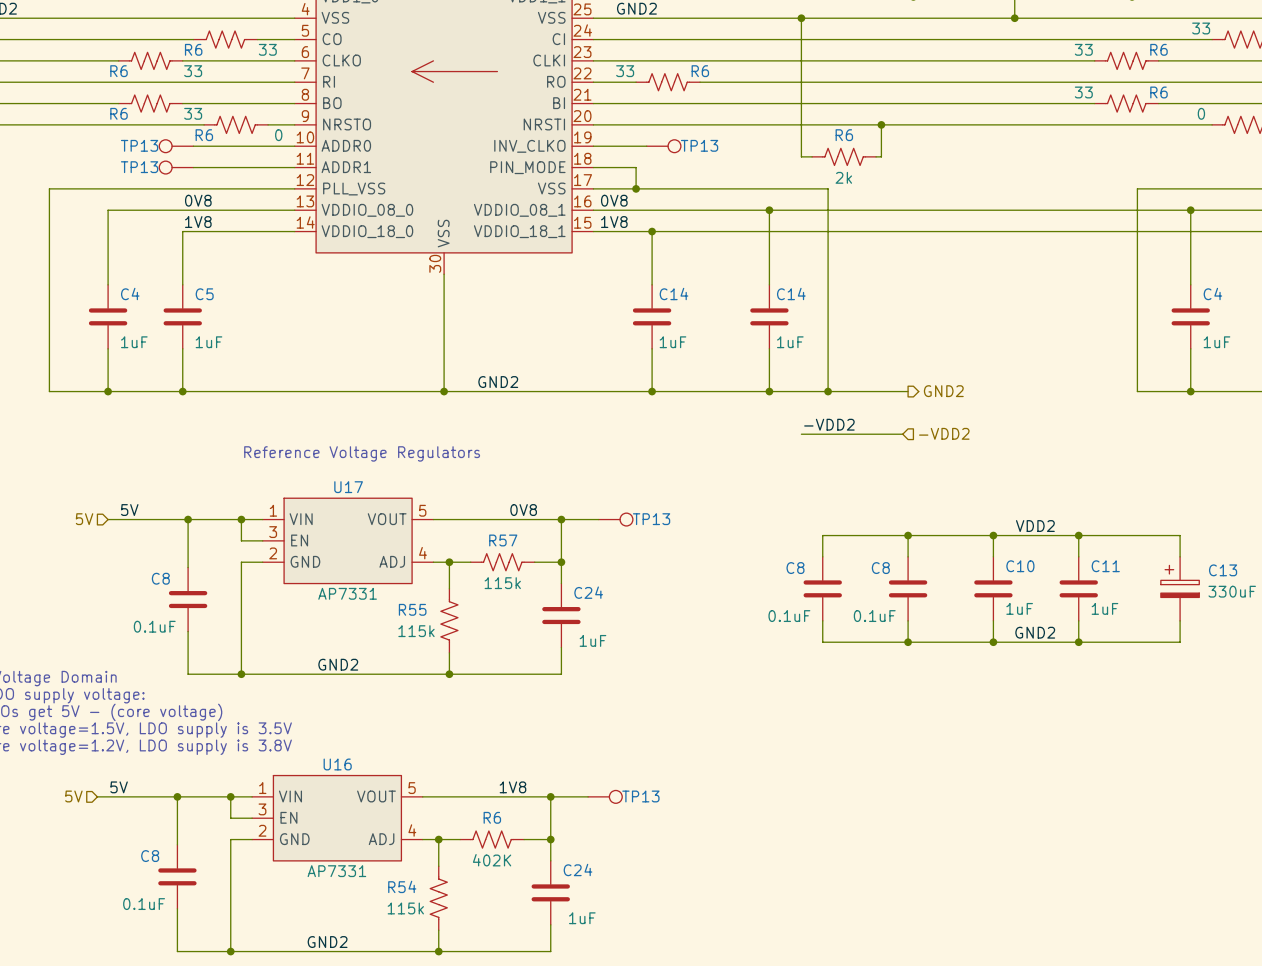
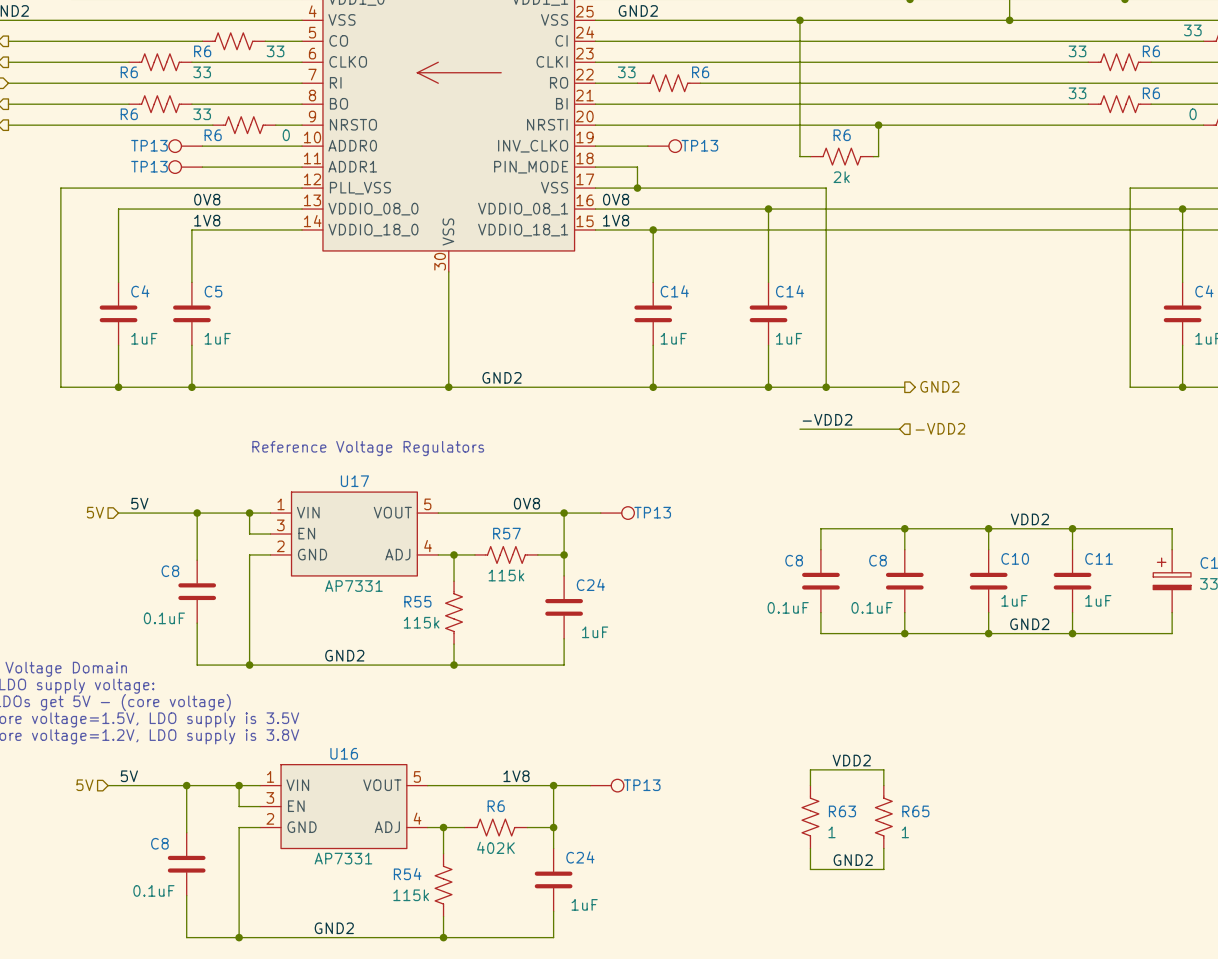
label: none -> VDD2 (851, 760)
wire: none -> (810, 785) (810, 769) (883, 769) (883, 785)
R63: none -> 1 (810, 817)
R65: none -> 1 (883, 817)
wire: none -> (810, 848) (810, 869) (883, 869) (883, 848)
label: none -> GND2 (853, 860)

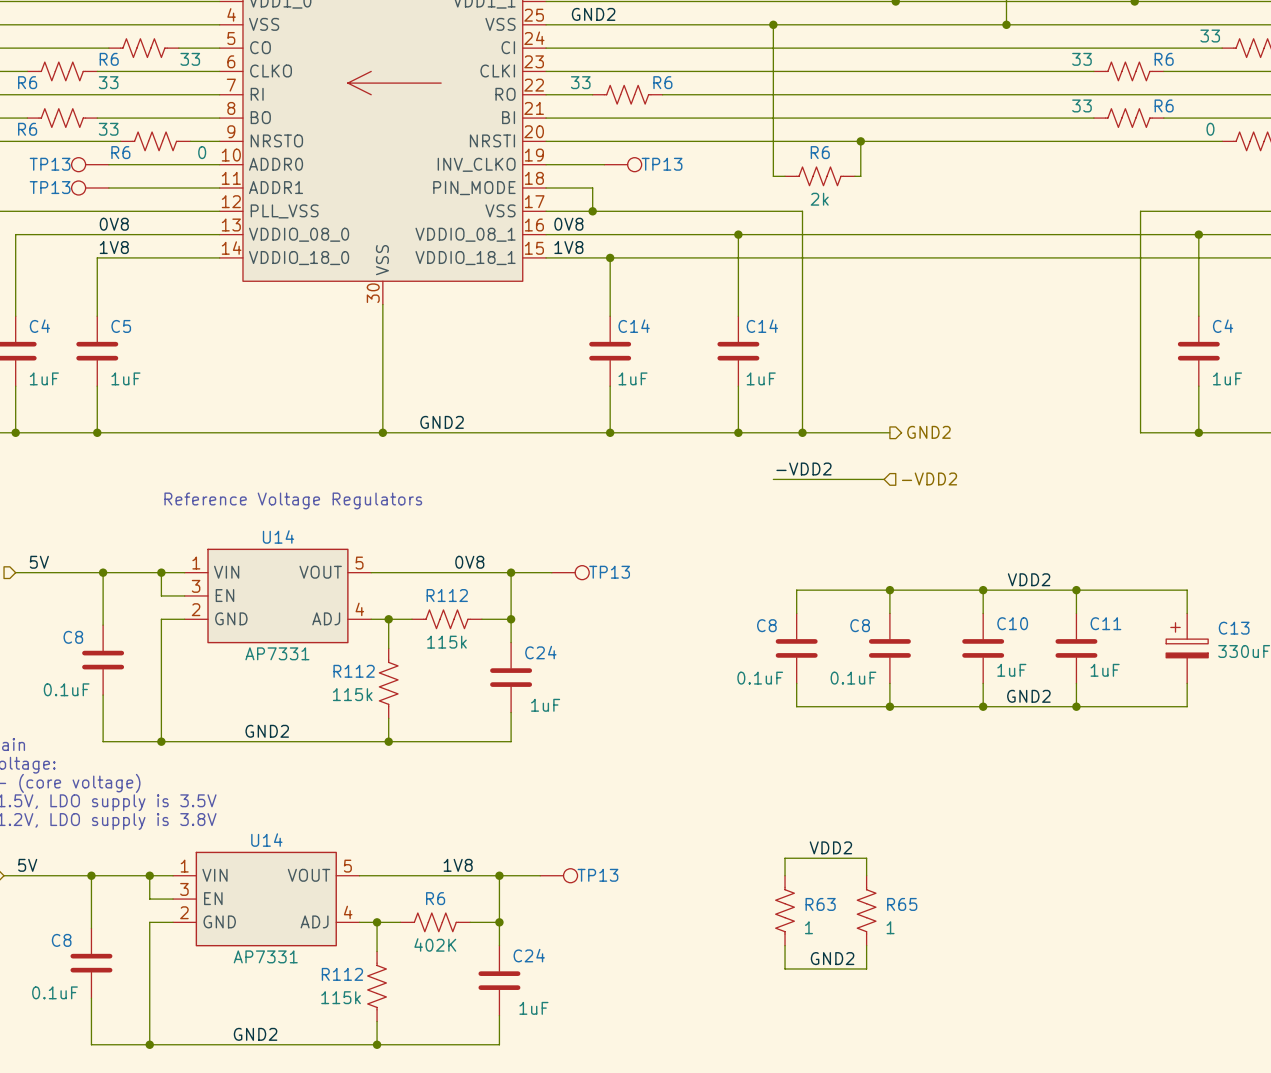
U17 name: U17 (354, 481) -> U14 (278, 536)
R57 name: R57 (506, 533) -> R112 (447, 595)
R55 name: R55 (417, 601) -> R112 (354, 671)
U16 name: U16 (344, 753) -> U14 (266, 840)
R54 name: R54 (407, 874) -> R112 (342, 974)

